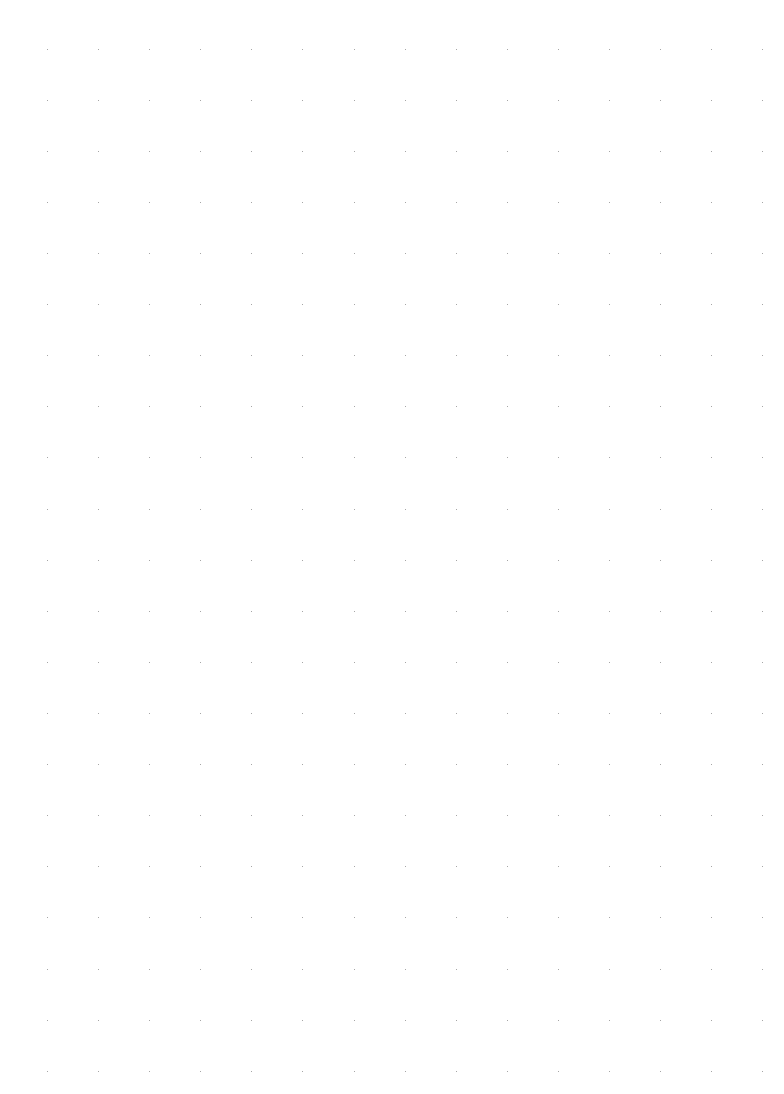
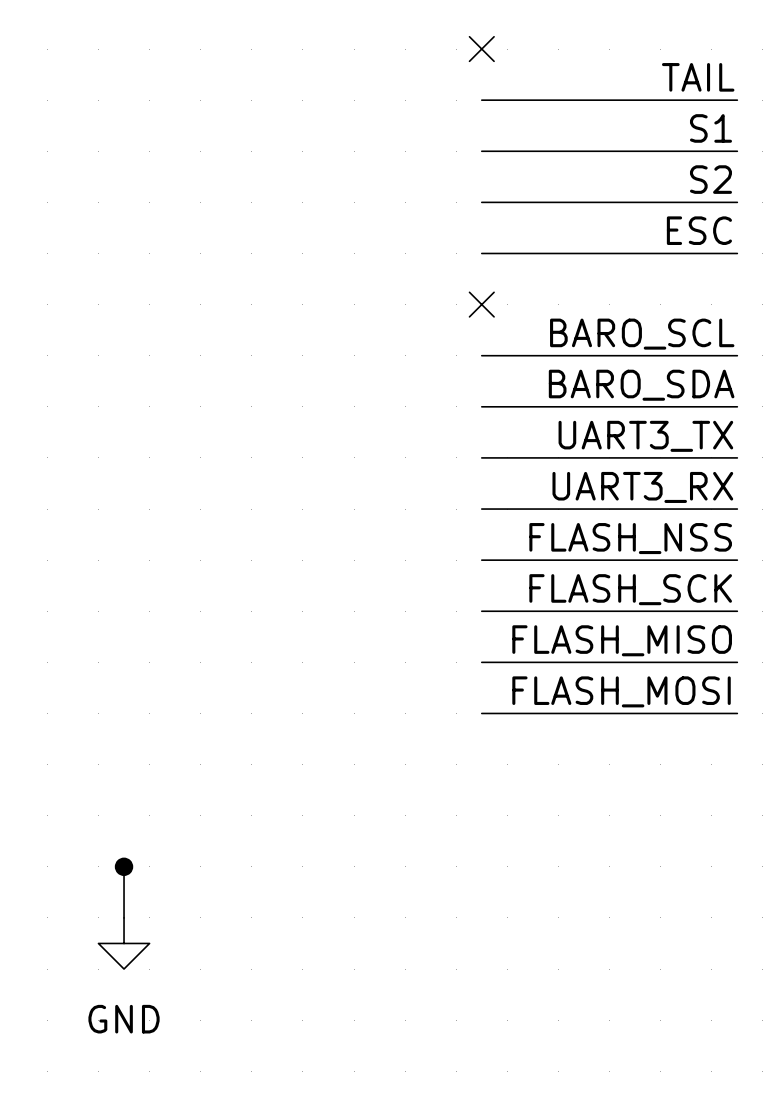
no-connect mark: none -> (481, 49)
label: none -> TAIL (698, 77)
wire: none -> (481, 100) (737, 100)
label: none -> S1 (710, 128)
wire: none -> (481, 151) (737, 151)
label: none -> S2 (710, 179)
wire: none -> (481, 202) (737, 202)
label: none -> ESC (699, 230)
wire: none -> (481, 253) (737, 253)
no-connect mark: none -> (481, 304)
label: none -> BARO_SCL (642, 334)
wire: none -> (481, 355) (737, 355)
label: none -> BARO_SDA (641, 385)
wire: none -> (481, 406) (737, 406)
label: none -> UART3_TX (645, 436)
wire: none -> (481, 457) (737, 457)
label: none -> UART3_RX (642, 487)
wire: none -> (481, 509) (737, 509)
label: none -> FLASH_NSS (630, 538)
wire: none -> (481, 560) (737, 560)
label: none -> FLASH_SCK (630, 589)
wire: none -> (481, 611) (737, 611)
label: none -> FLASH_MISO (622, 640)
wire: none -> (481, 662) (737, 662)
label: none -> FLASH_MOSI (621, 691)
wire: none -> (481, 713) (737, 713)
wire: none -> (124, 866) (124, 917)
junction: none -> (124, 866)
power symbol: none -> GND (124, 943)

